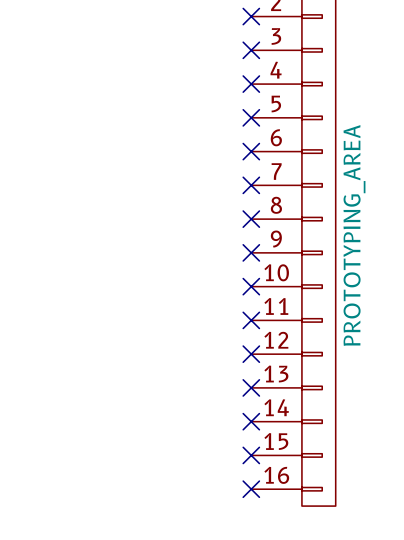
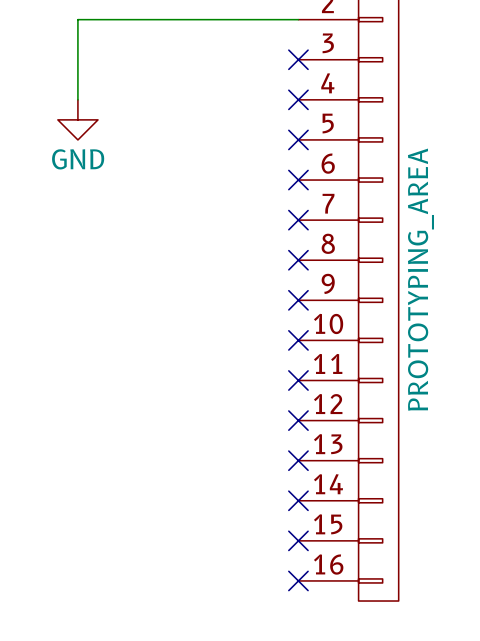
wire: none -> (298, 19) (77, 19) (77, 99)
no-connect mark: (251, 16) -> none
power symbol: none -> GND (77, 119)

